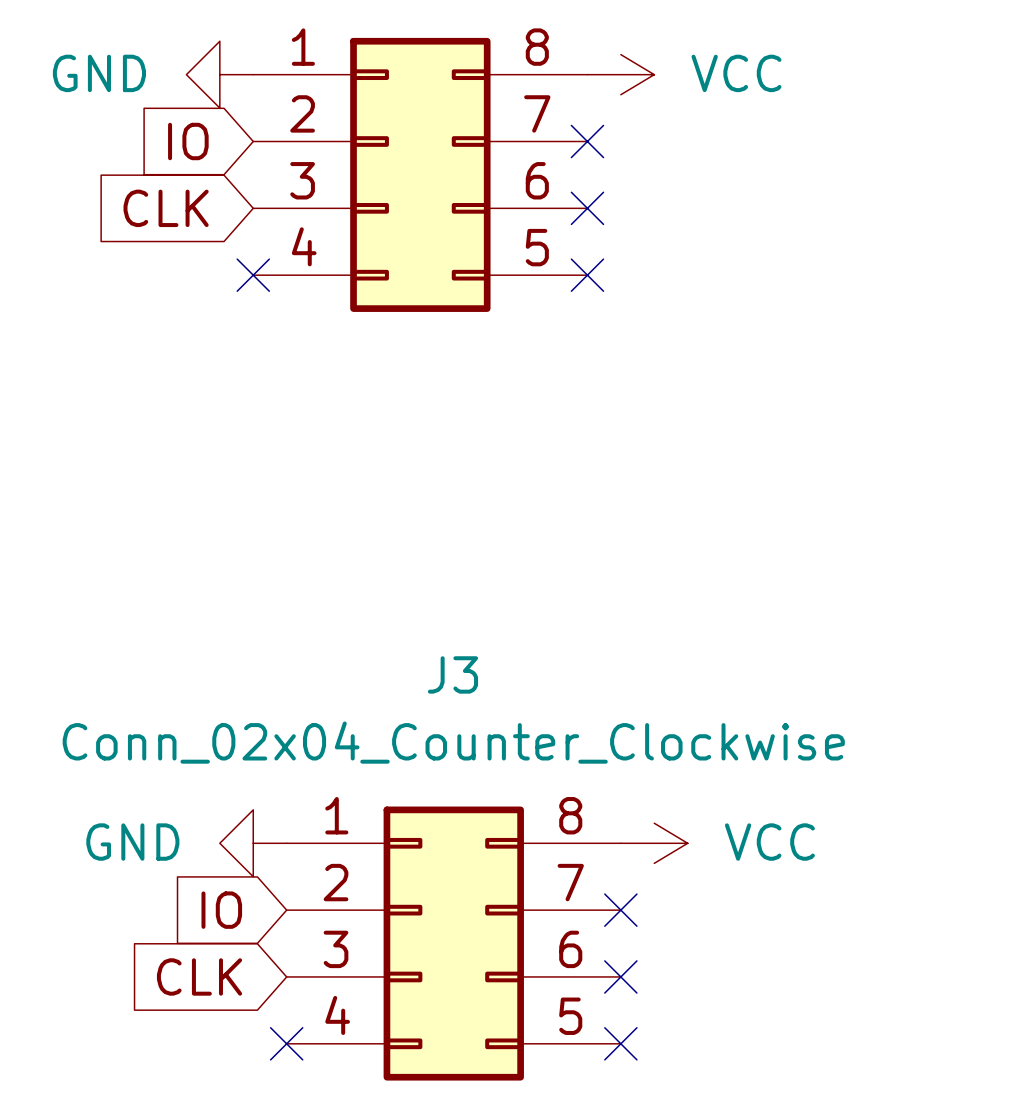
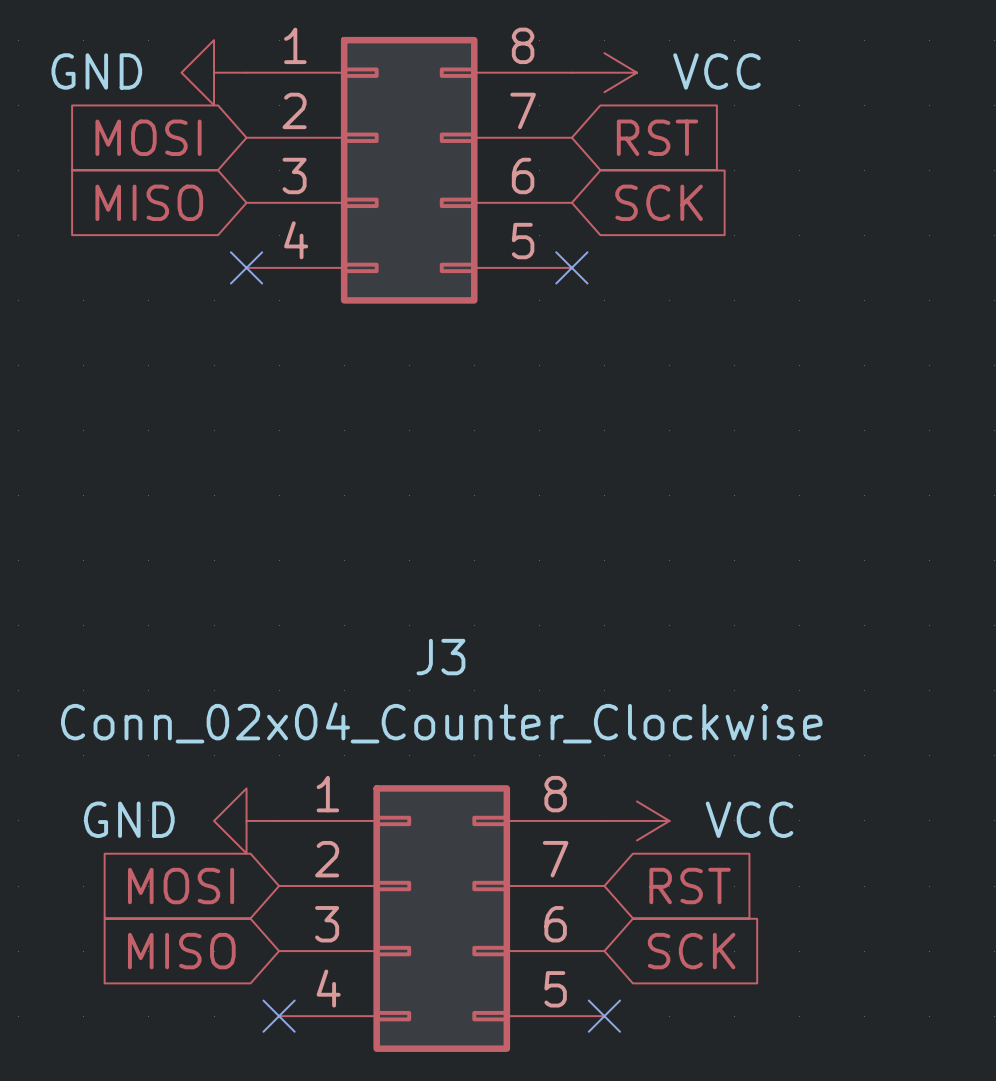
global label: IO (188, 141) -> MOSI (148, 137)
no-connect mark: (587, 141) -> none
global label: none -> RST (657, 137)
global label: CLK (166, 208) -> MISO (149, 202)
no-connect mark: (587, 208) -> none
global label: none -> SCK (659, 202)
global label: IO (221, 910) -> MOSI (181, 886)
no-connect mark: (620, 910) -> none
global label: none -> RST (690, 886)
global label: CLK (199, 976) -> MISO (181, 951)
no-connect mark: (620, 976) -> none
global label: none -> SCK (691, 951)

